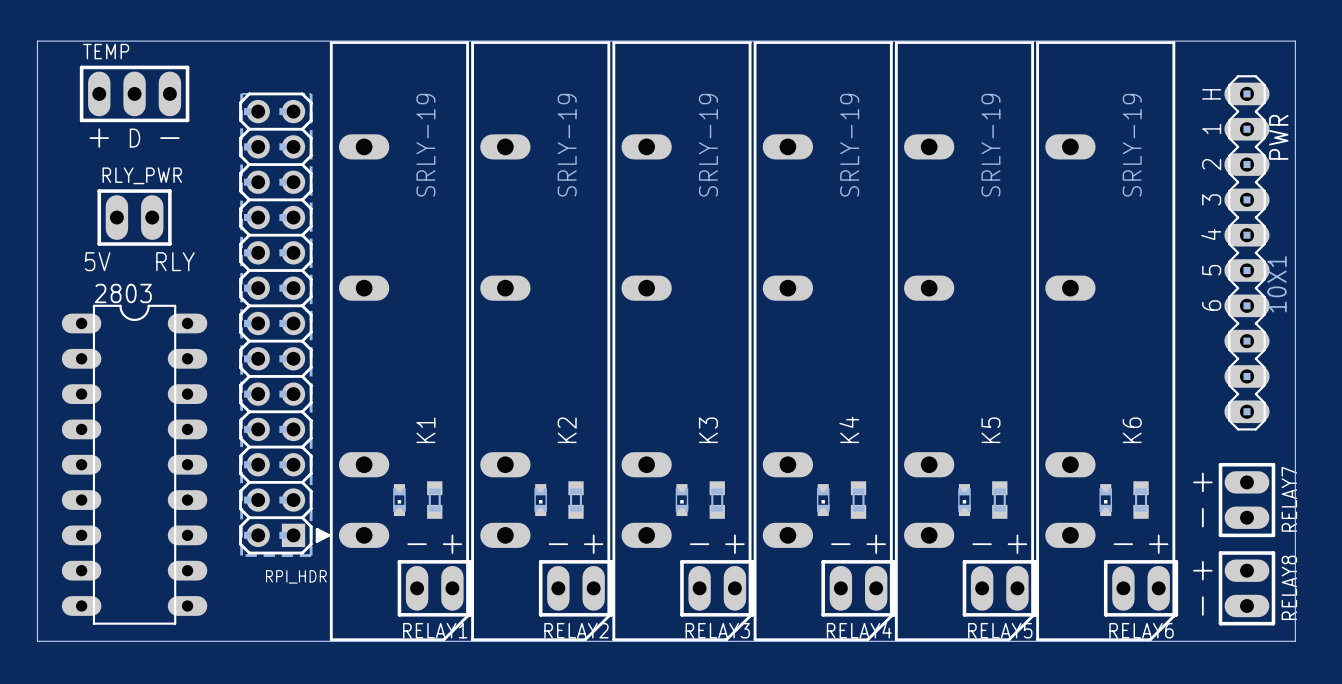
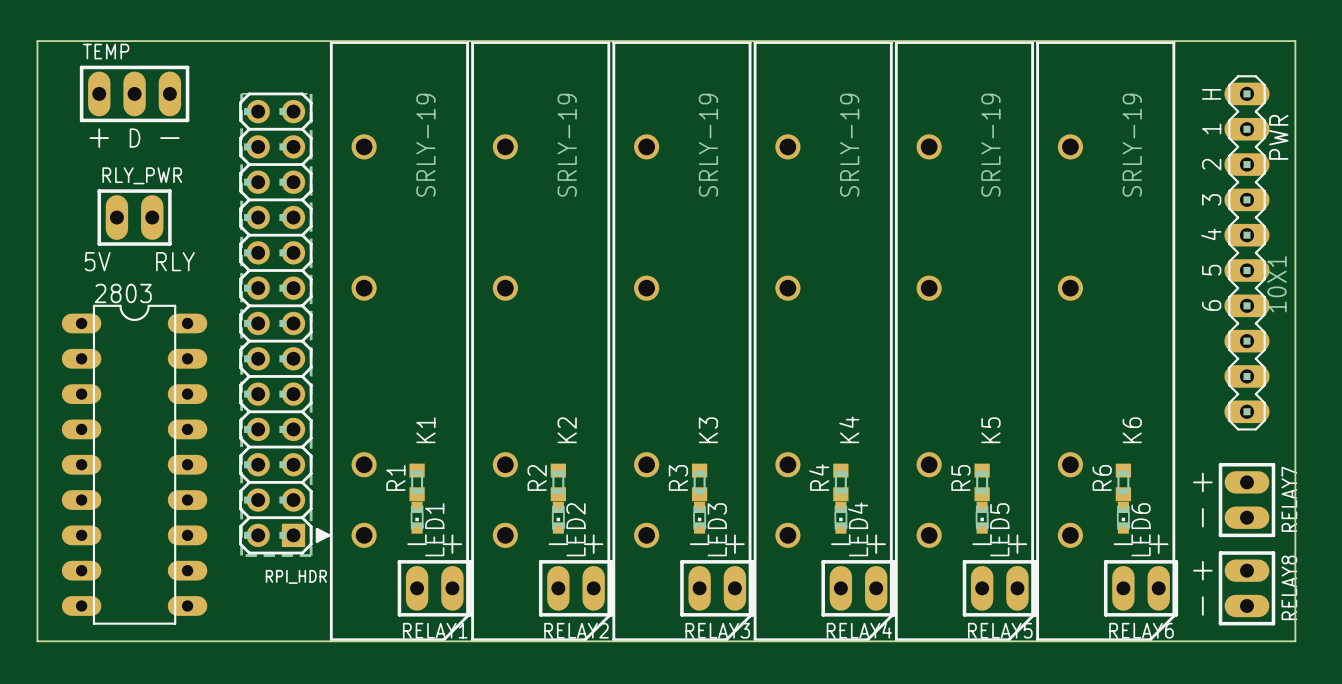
K1 footprint: [329, 41, 469, 642] -> [329, 41, 469, 642]
K2 footprint: [471, 41, 611, 642] -> [471, 41, 611, 642]
K3 footprint: [612, 41, 752, 642] -> [612, 41, 752, 642]
K4 footprint: [753, 41, 893, 642] -> [753, 41, 893, 642]
K5 footprint: [894, 41, 1035, 642] -> [894, 41, 1035, 642]
K6 footprint: [1036, 41, 1176, 642] -> [1036, 41, 1176, 642]
R1: none -> (417, 482)
R2: none -> (558, 482)
R3: none -> (699, 482)
R4: none -> (840, 482)
R5: none -> (982, 482)
R6: none -> (1123, 482)
part: (399, 500) -> none
part: (434, 500) -> none
part: (540, 500) -> none
part: (576, 500) -> none
part: (681, 500) -> none
part: (717, 500) -> none
part: (823, 500) -> none
part: (858, 500) -> none
part: (964, 500) -> none
part: (999, 500) -> none
part: (1105, 500) -> none
part: (1141, 500) -> none
LED1: none -> (417, 517)
LED2: none -> (558, 517)
LED3: none -> (699, 517)
LED4: none -> (840, 517)
LED5: none -> (982, 517)
LED6: none -> (1123, 517)

